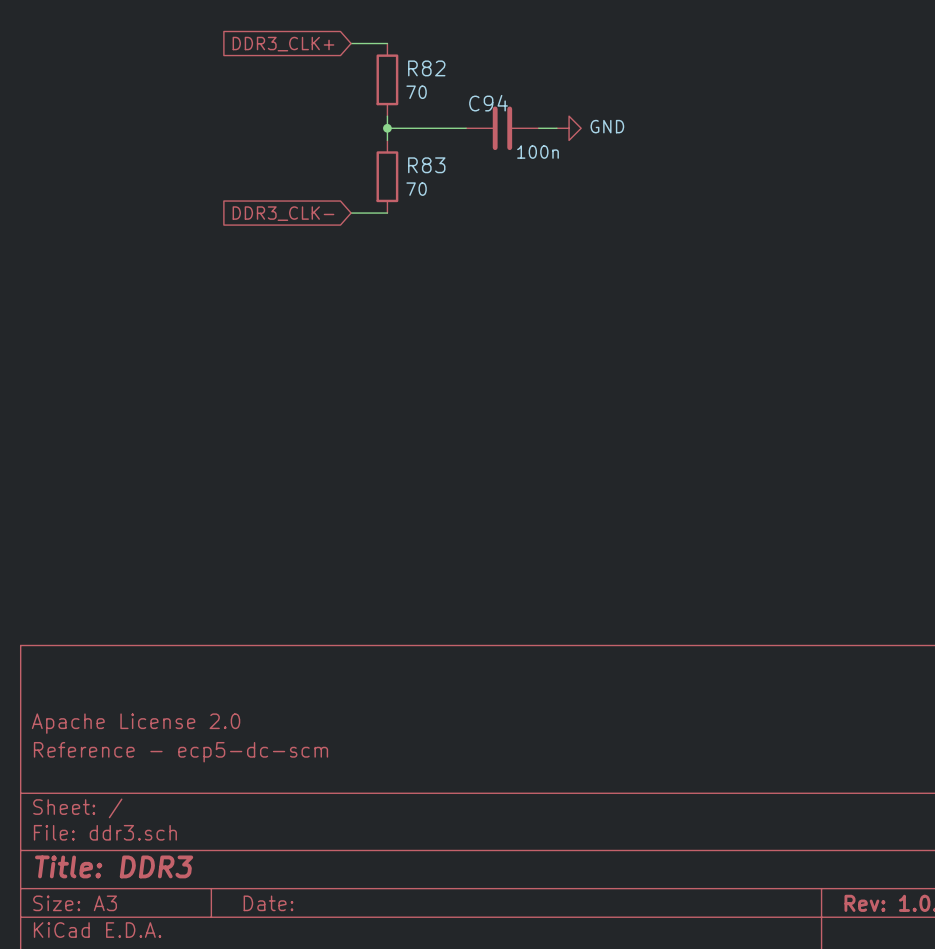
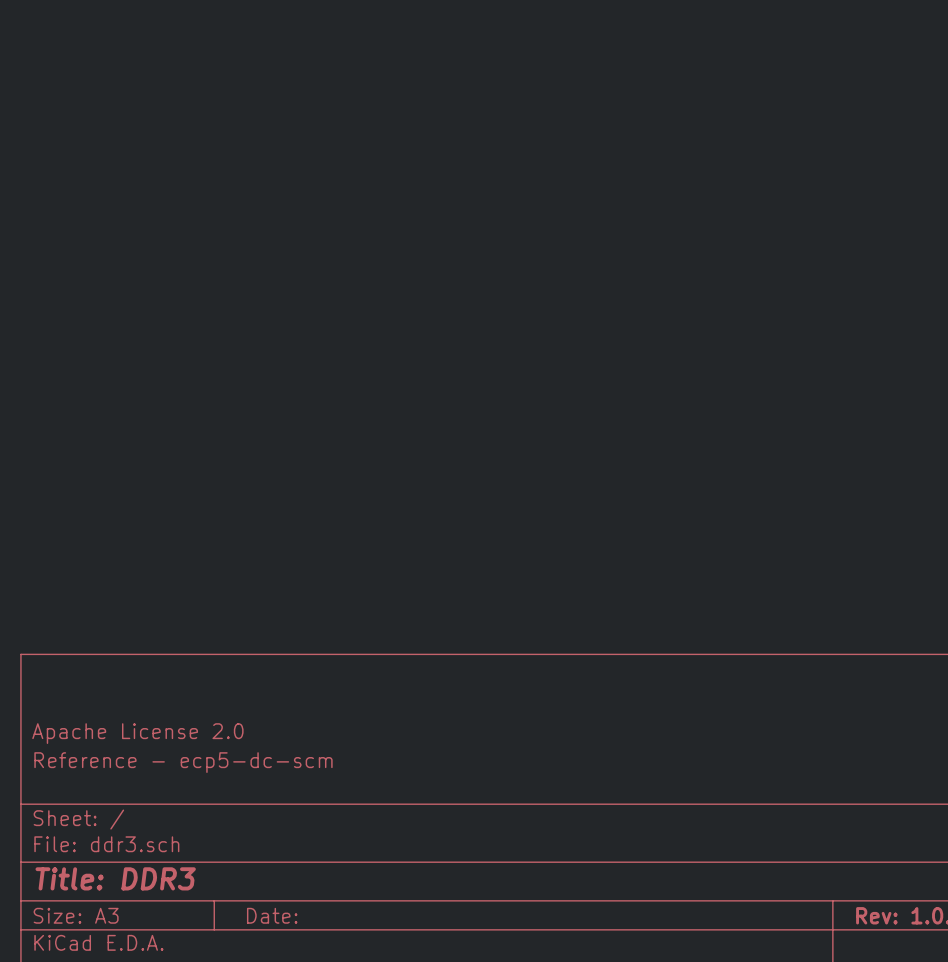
wire: (351, 43) (387, 43) -> none
global label: DDR3_CLK+ (283, 44) -> none
R82: (387, 79) -> none
wire: (387, 116) (387, 140) -> none
wire: (387, 128) (466, 128) -> none
junction: (387, 128) -> none
C94: (502, 128) -> none
wire: (538, 128) (556, 128) -> none
power symbol: GND (569, 128) -> none
R83: (387, 176) -> none
global label: DDR3_CLK- (283, 213) -> none
wire: (351, 213) (387, 213) -> none

